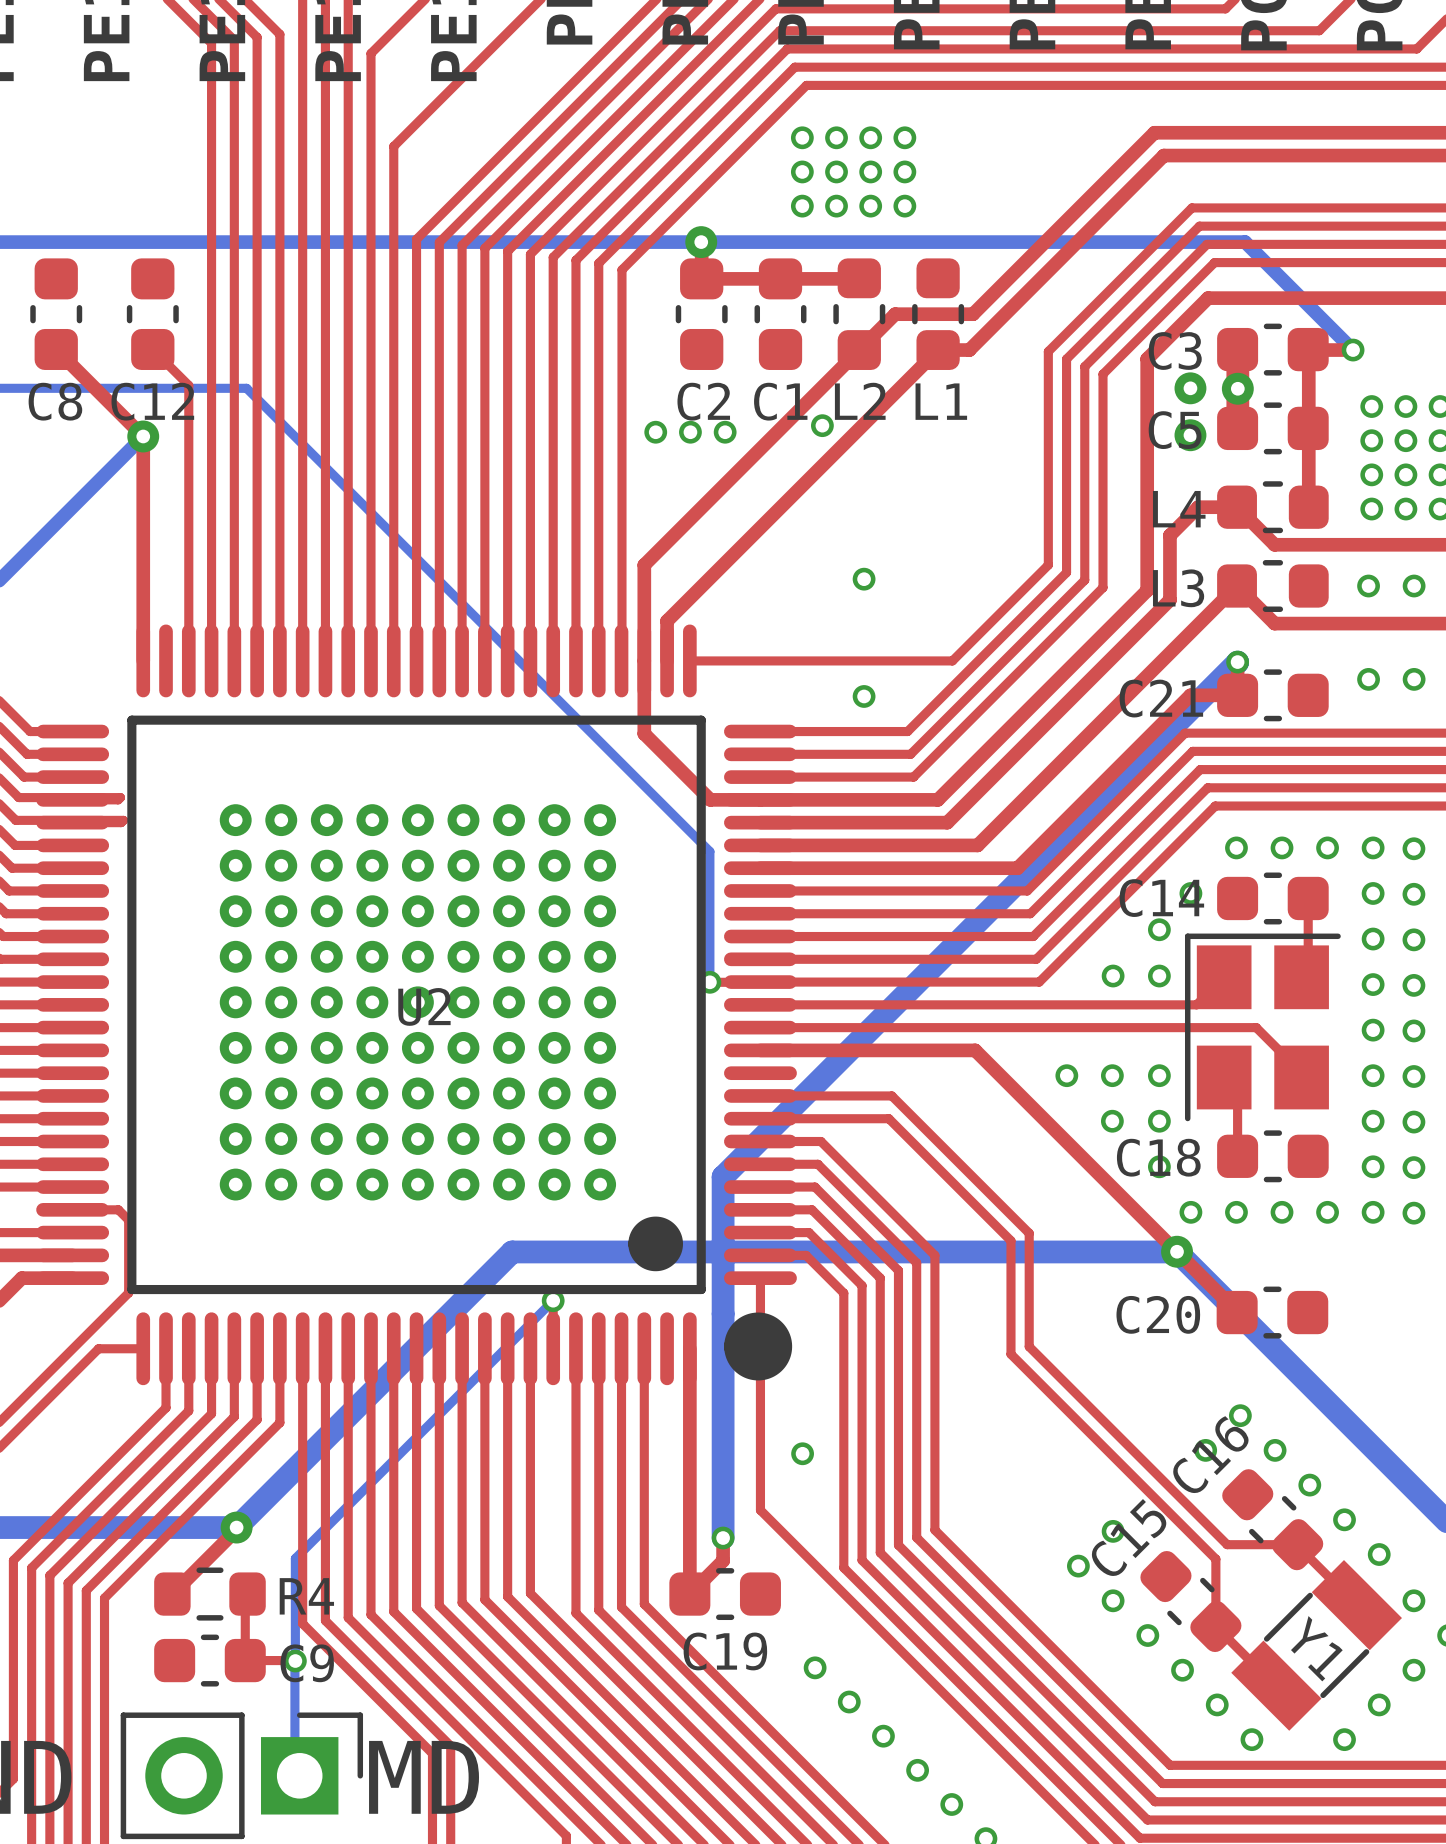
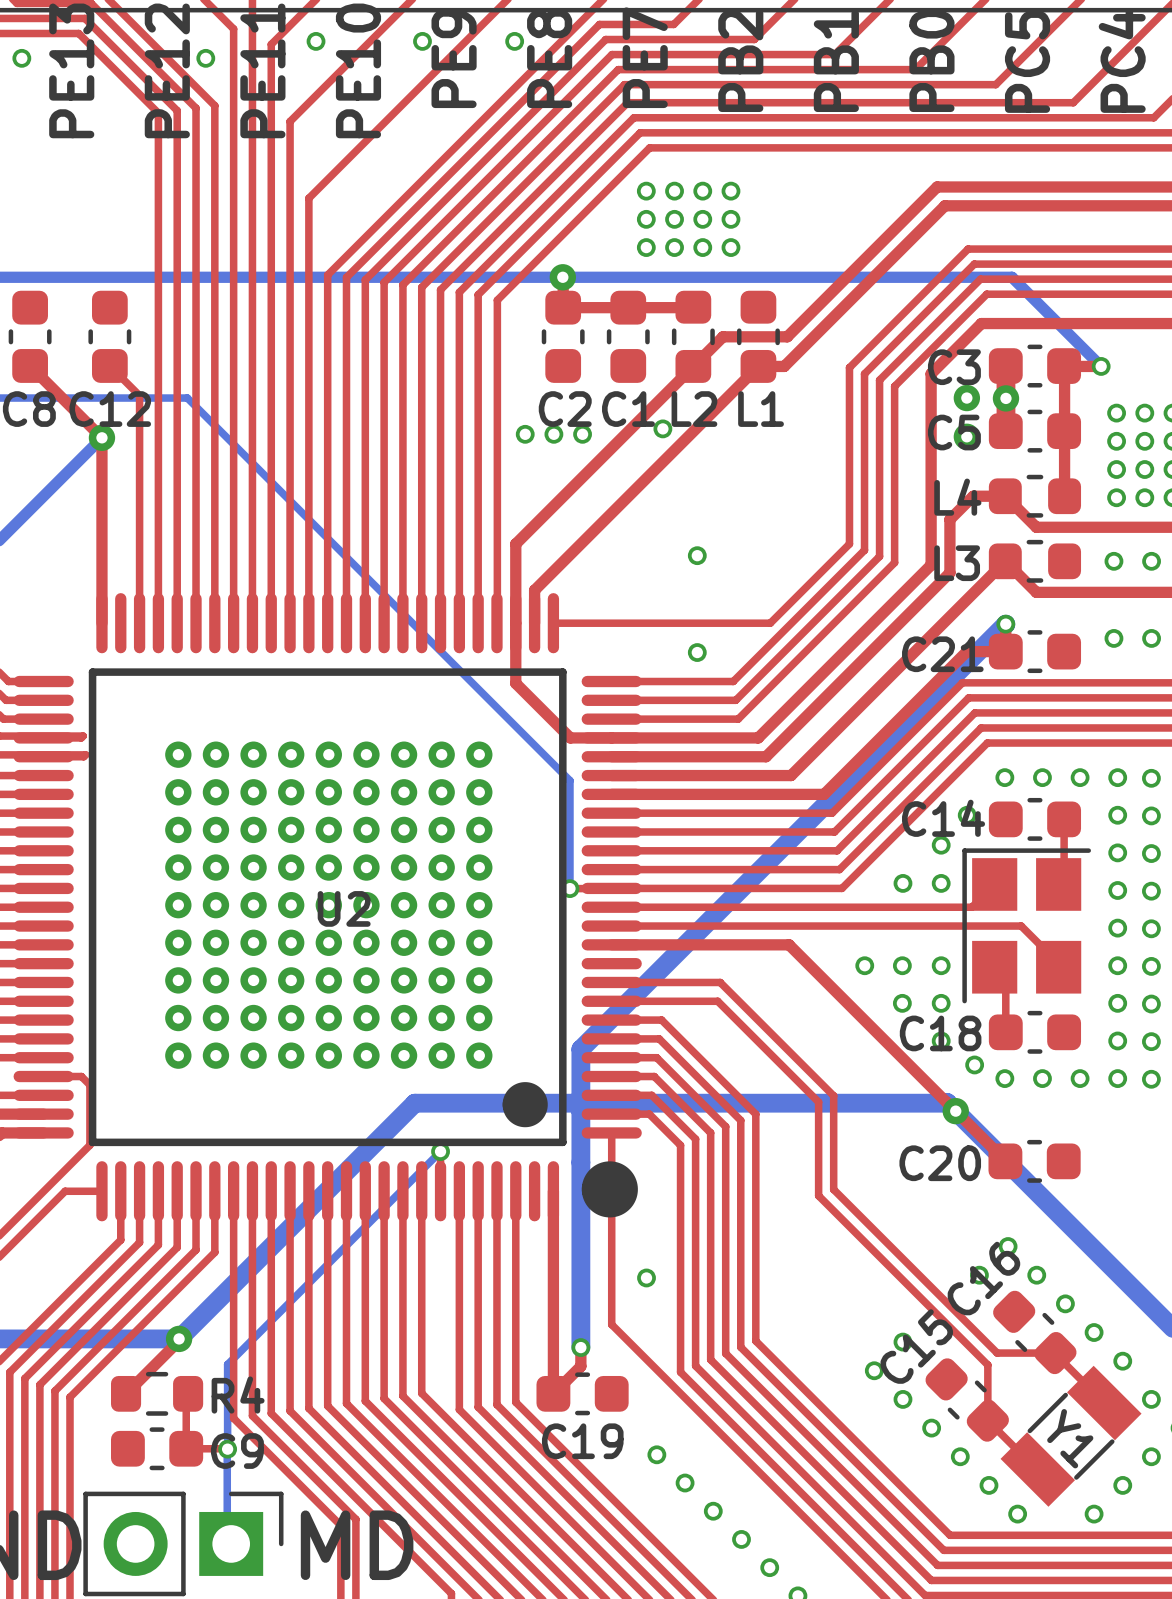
via position: (1190, 1212) -> (974, 1064)
bottom track: none -> (946, 1102) (955, 1111) (947, 1103) (589, 1103) (580, 1111)
bottom track: (512, 1251) (1176, 1251) -> (406, 1111) (414, 1103) (576, 1103) (580, 1098)

